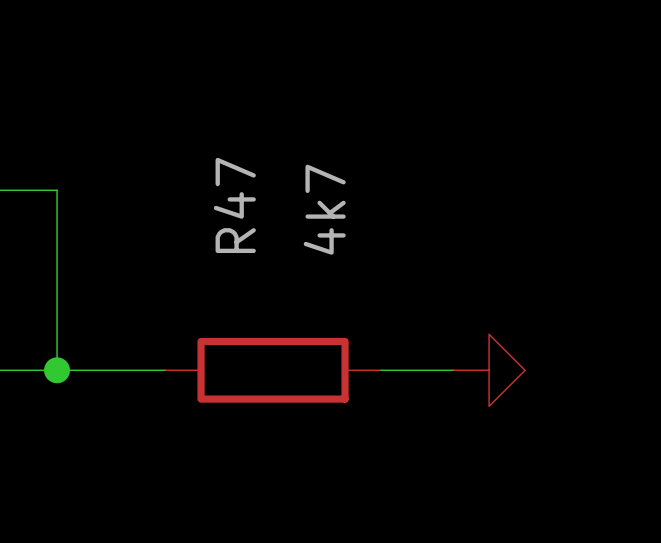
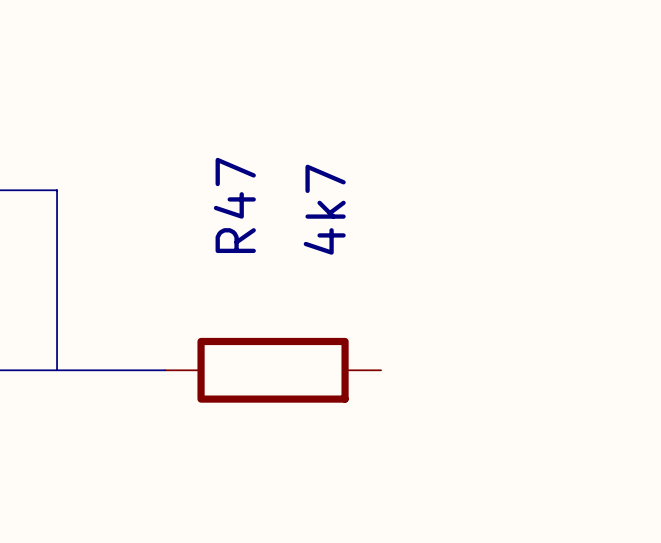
junction: (57, 370) -> none
wire: (381, 370) (453, 370) -> none
power symbol: (489, 370) -> none

